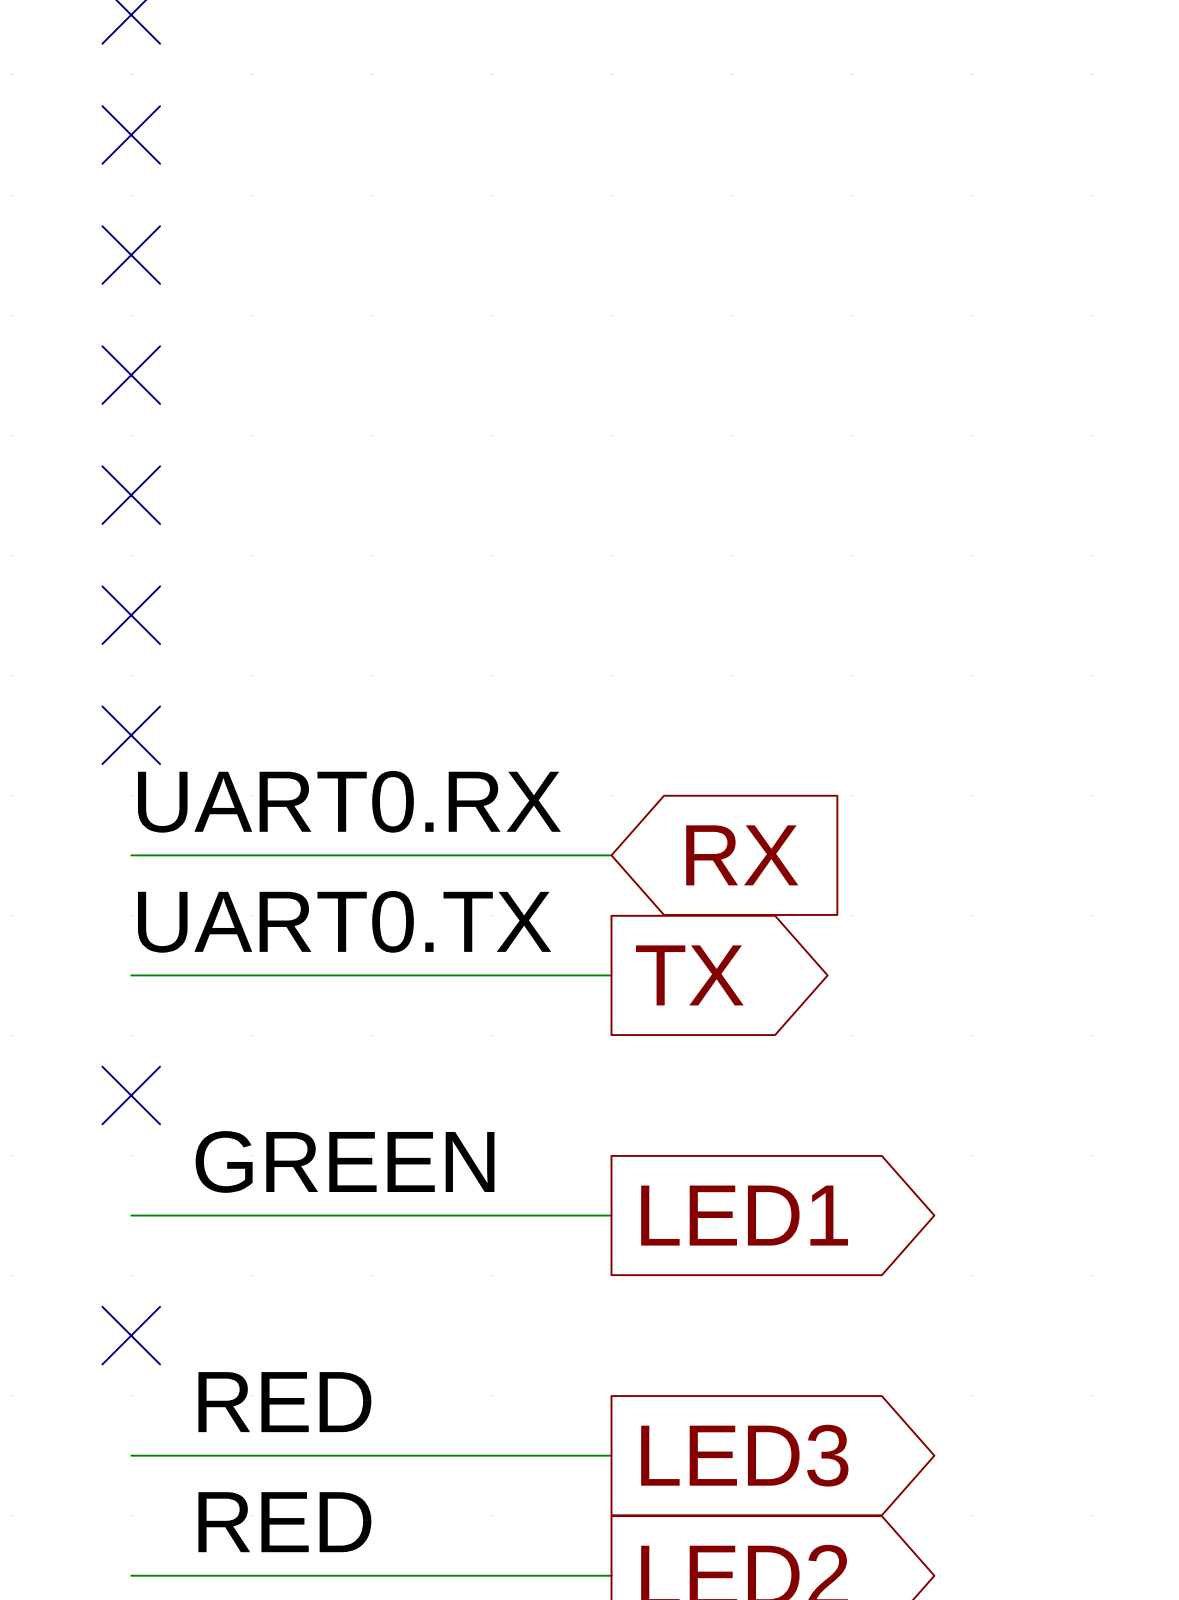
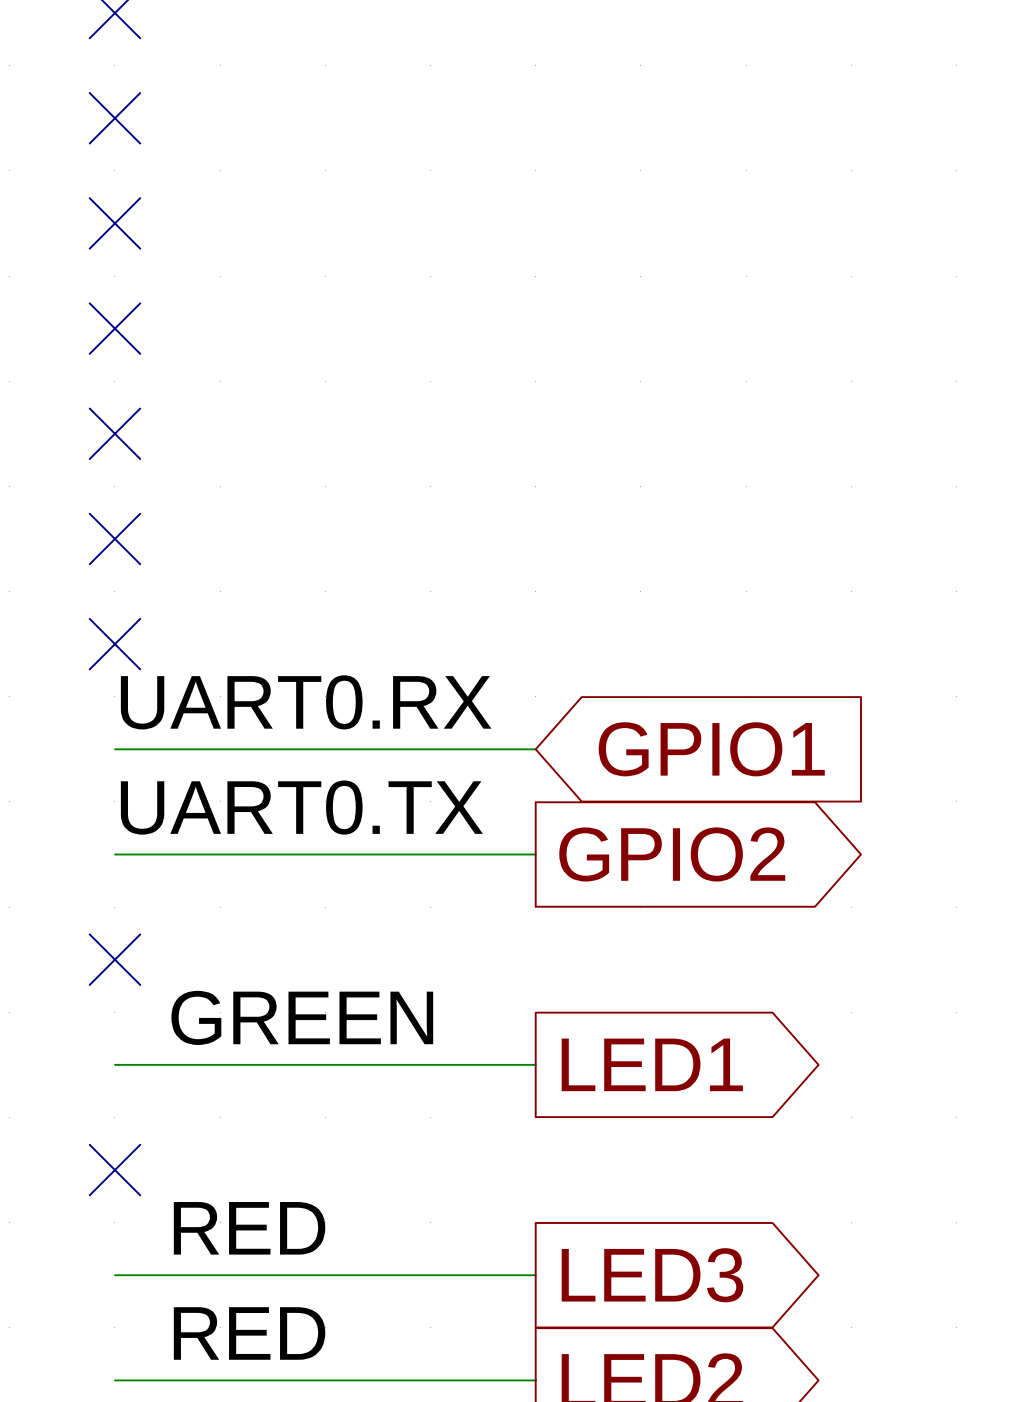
global label: RX (742, 855) -> GPIO1 (711, 749)
global label: TX (689, 975) -> GPIO2 (672, 854)

